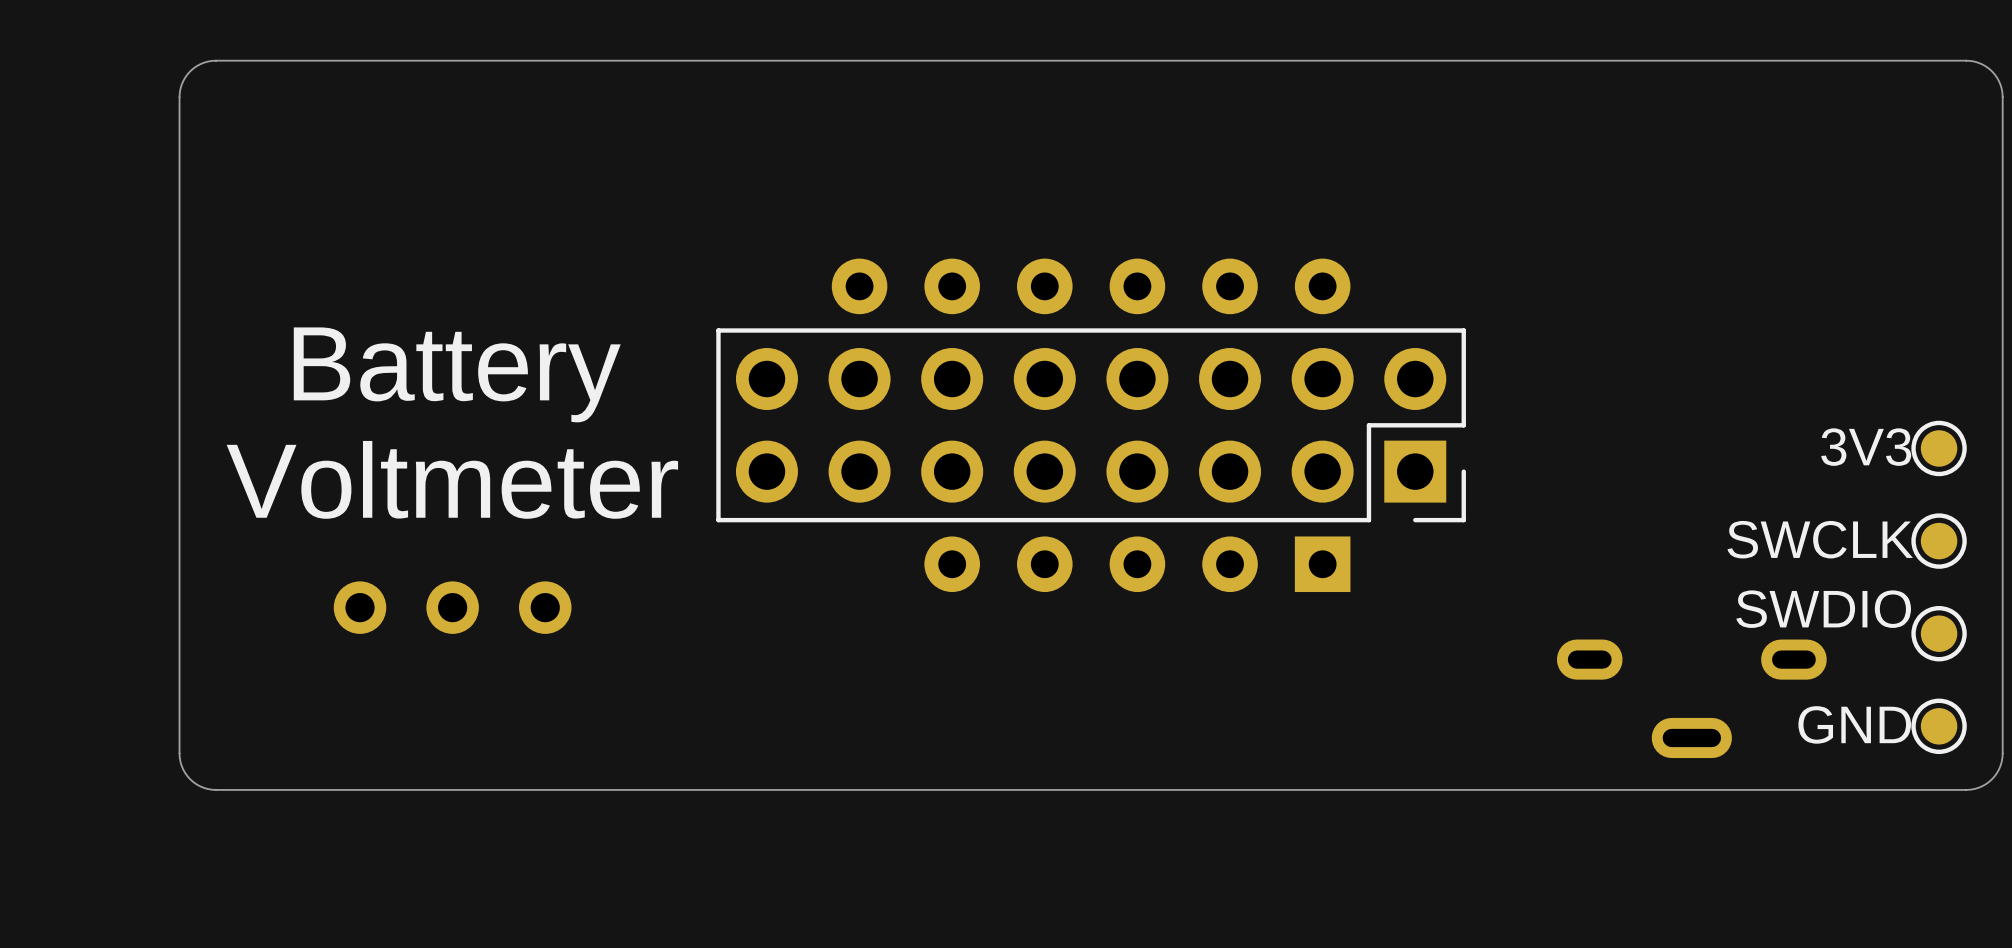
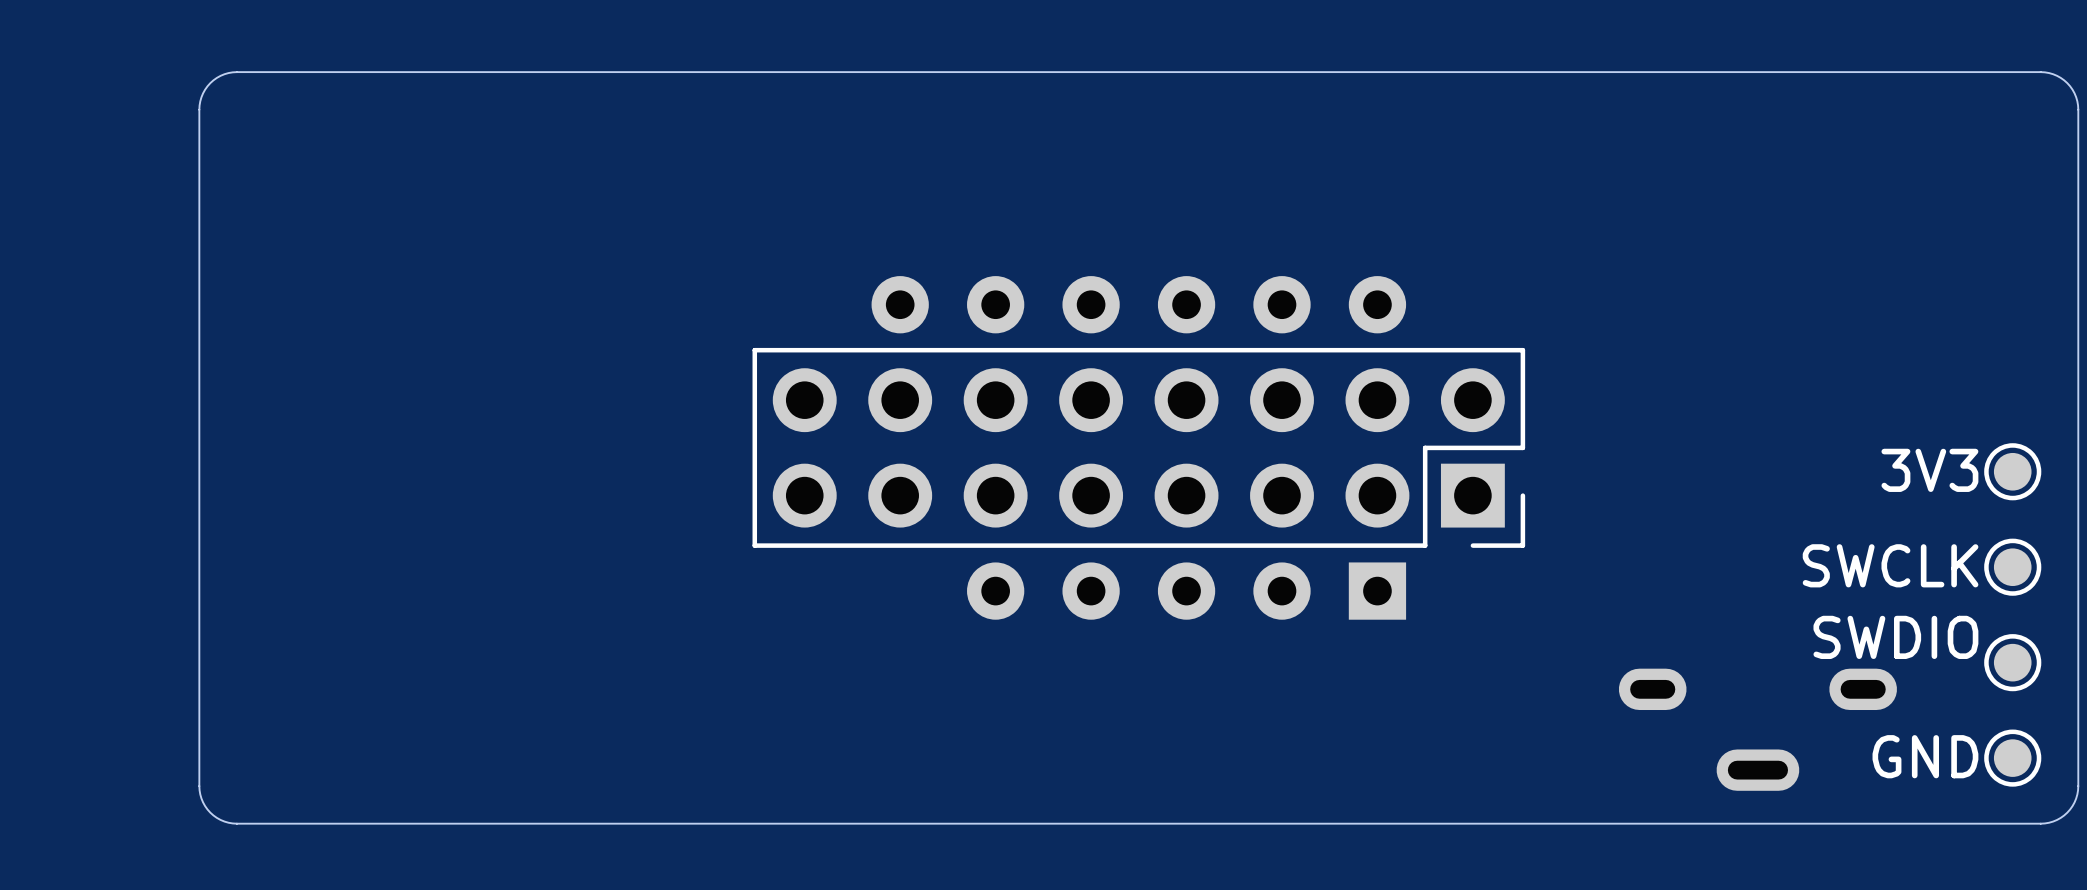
text: Battery (457, 374) -> none
text: Voltmeter (452, 479) -> none
part: (452, 607) -> none

